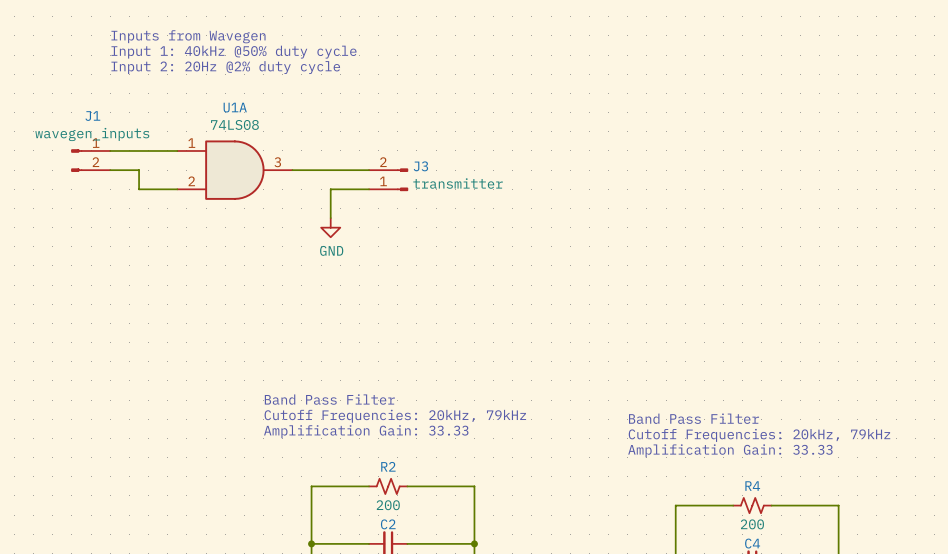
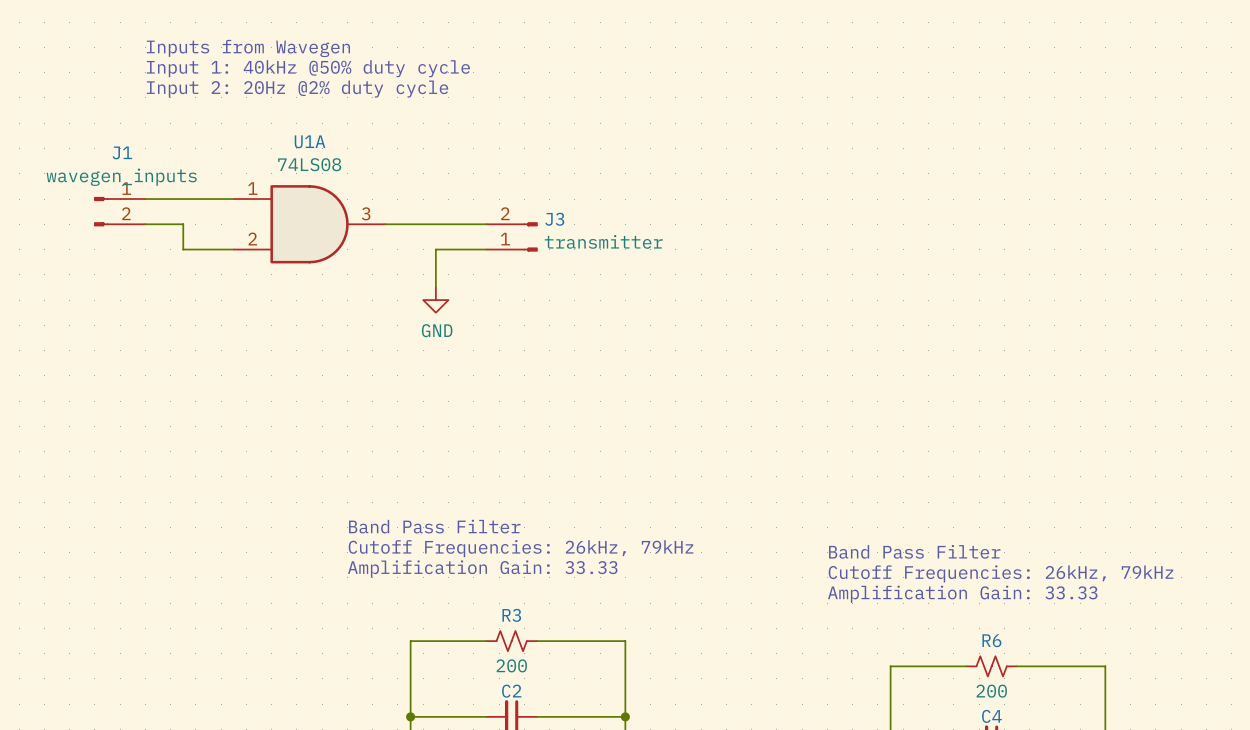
text: Cutoff Frequencies: 20kHz, 79kHz (395, 416) -> Cutoff Frequencies: 26kHz, 79kHz (521, 548)
text: Cutoff Frequencies: 20kHz, 79kHz (759, 435) -> Cutoff Frequencies: 26kHz, 79kHz (1001, 573)
R2 name: R2 (388, 466) -> R3 (511, 615)
R4 name: R4 (752, 486) -> R6 (991, 640)

